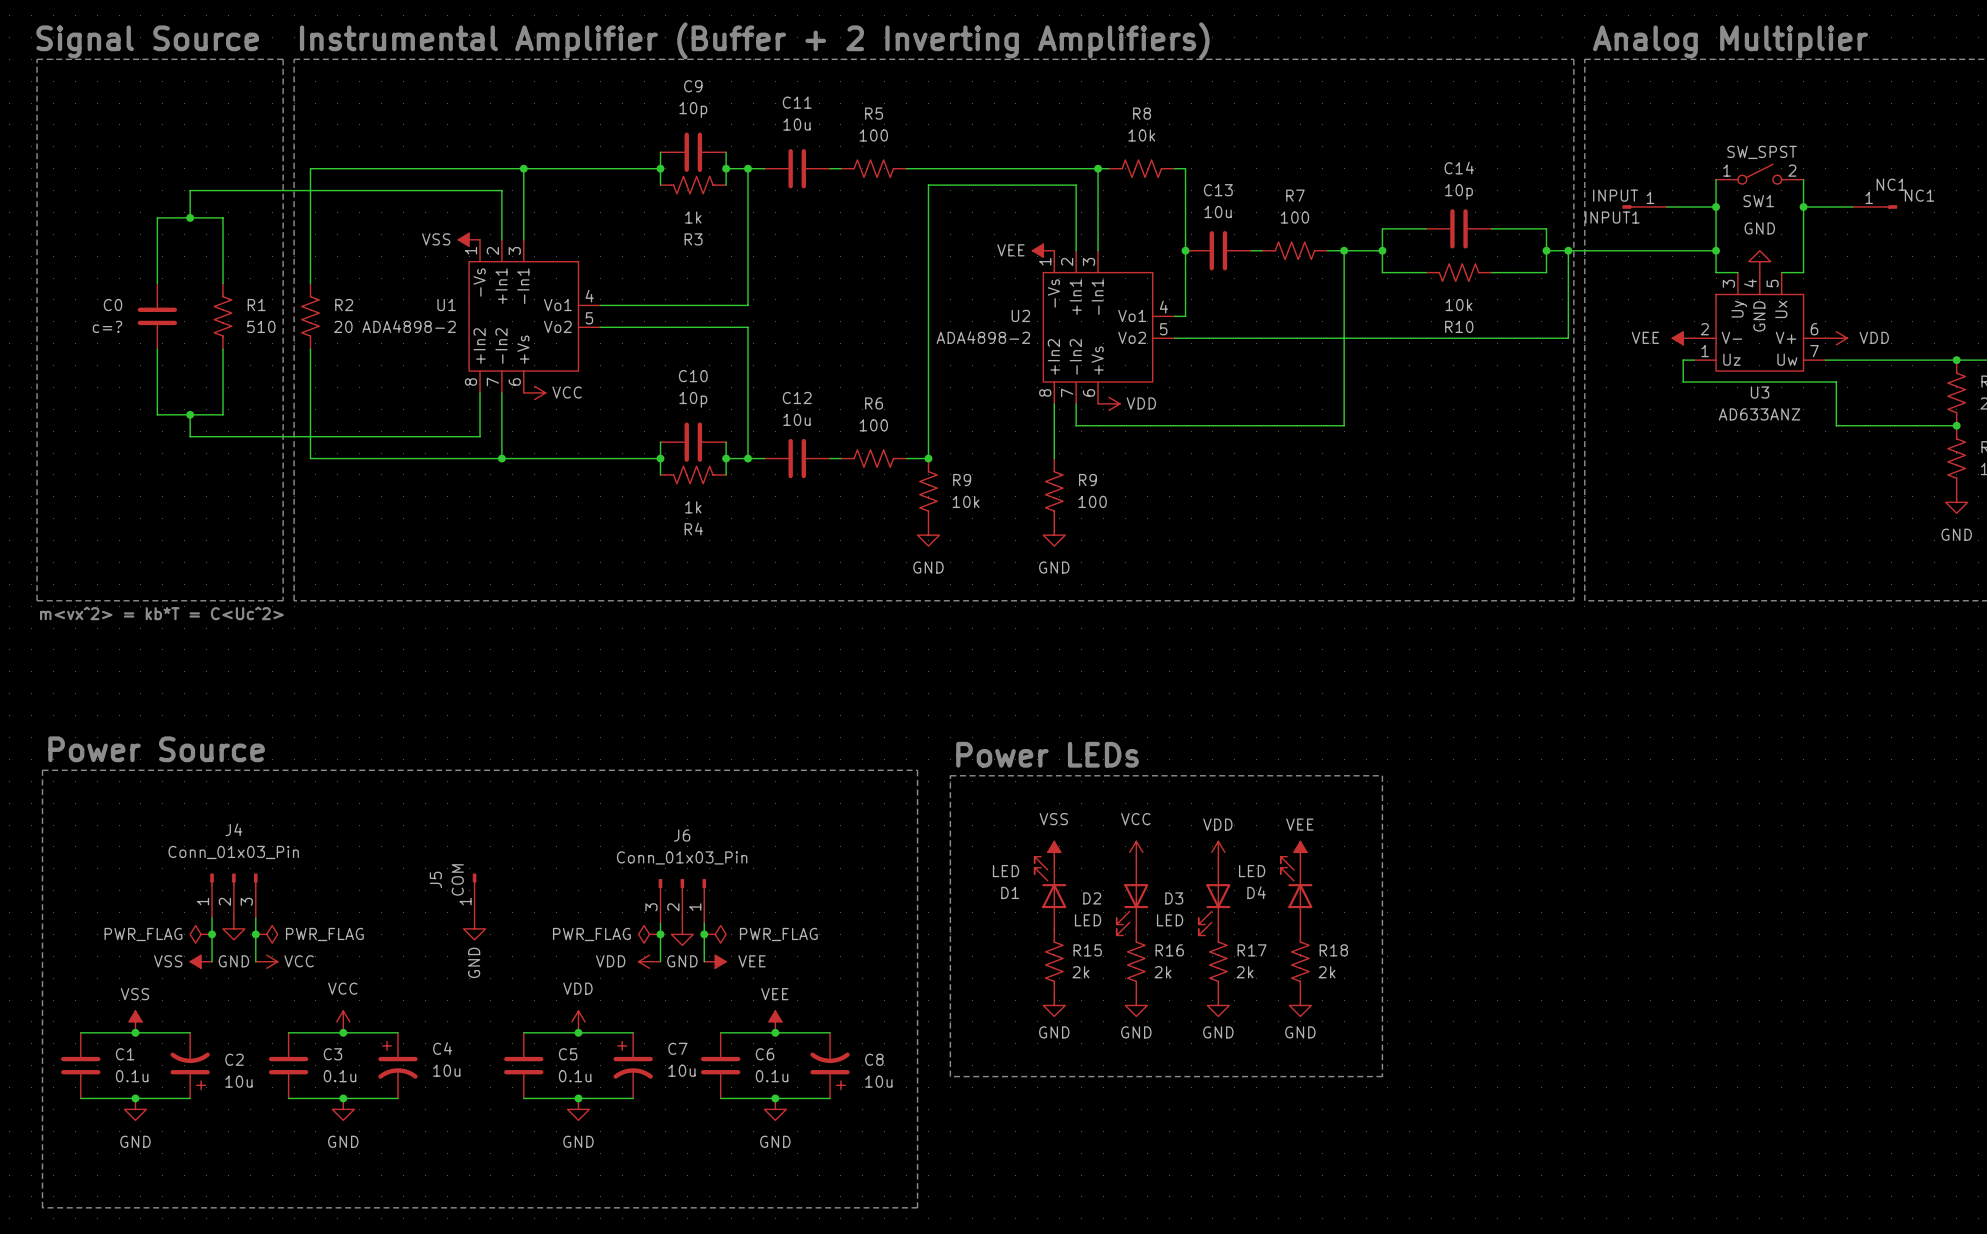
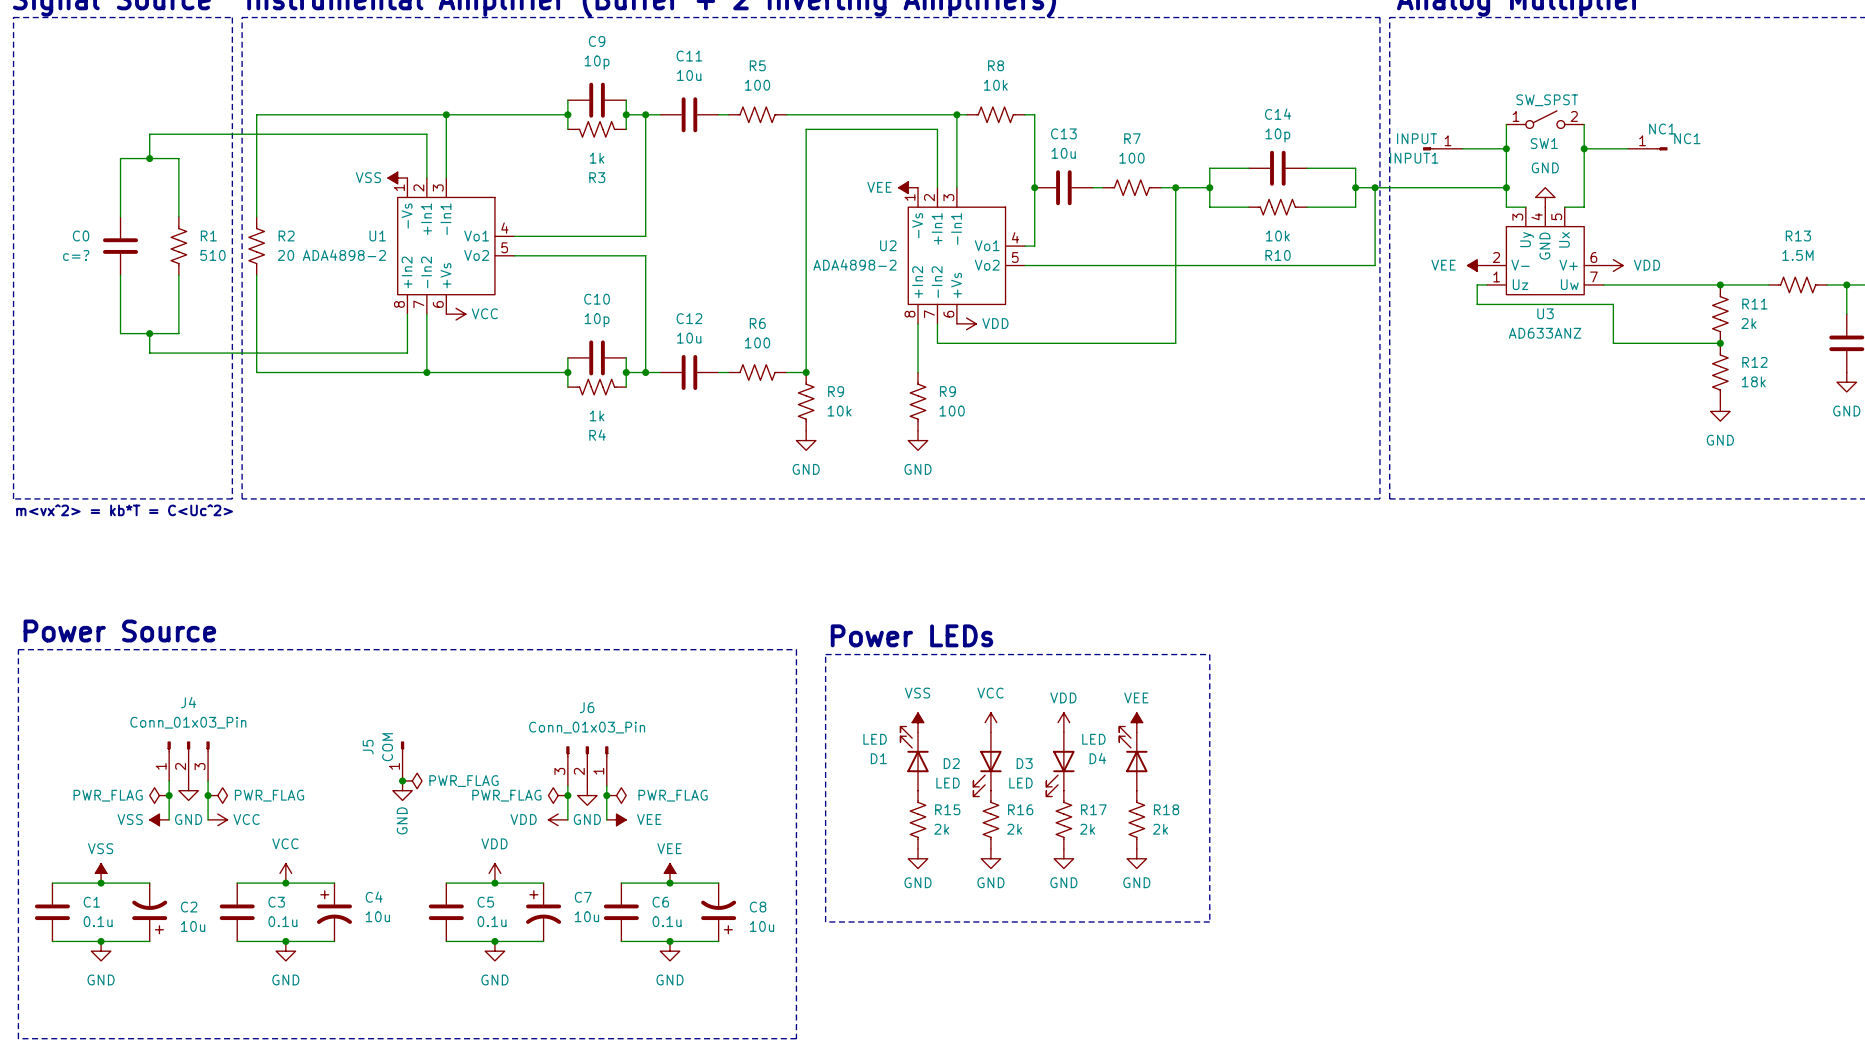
junction: none -> (402, 780)
power symbol: none -> PWR_FLAG (412, 780)

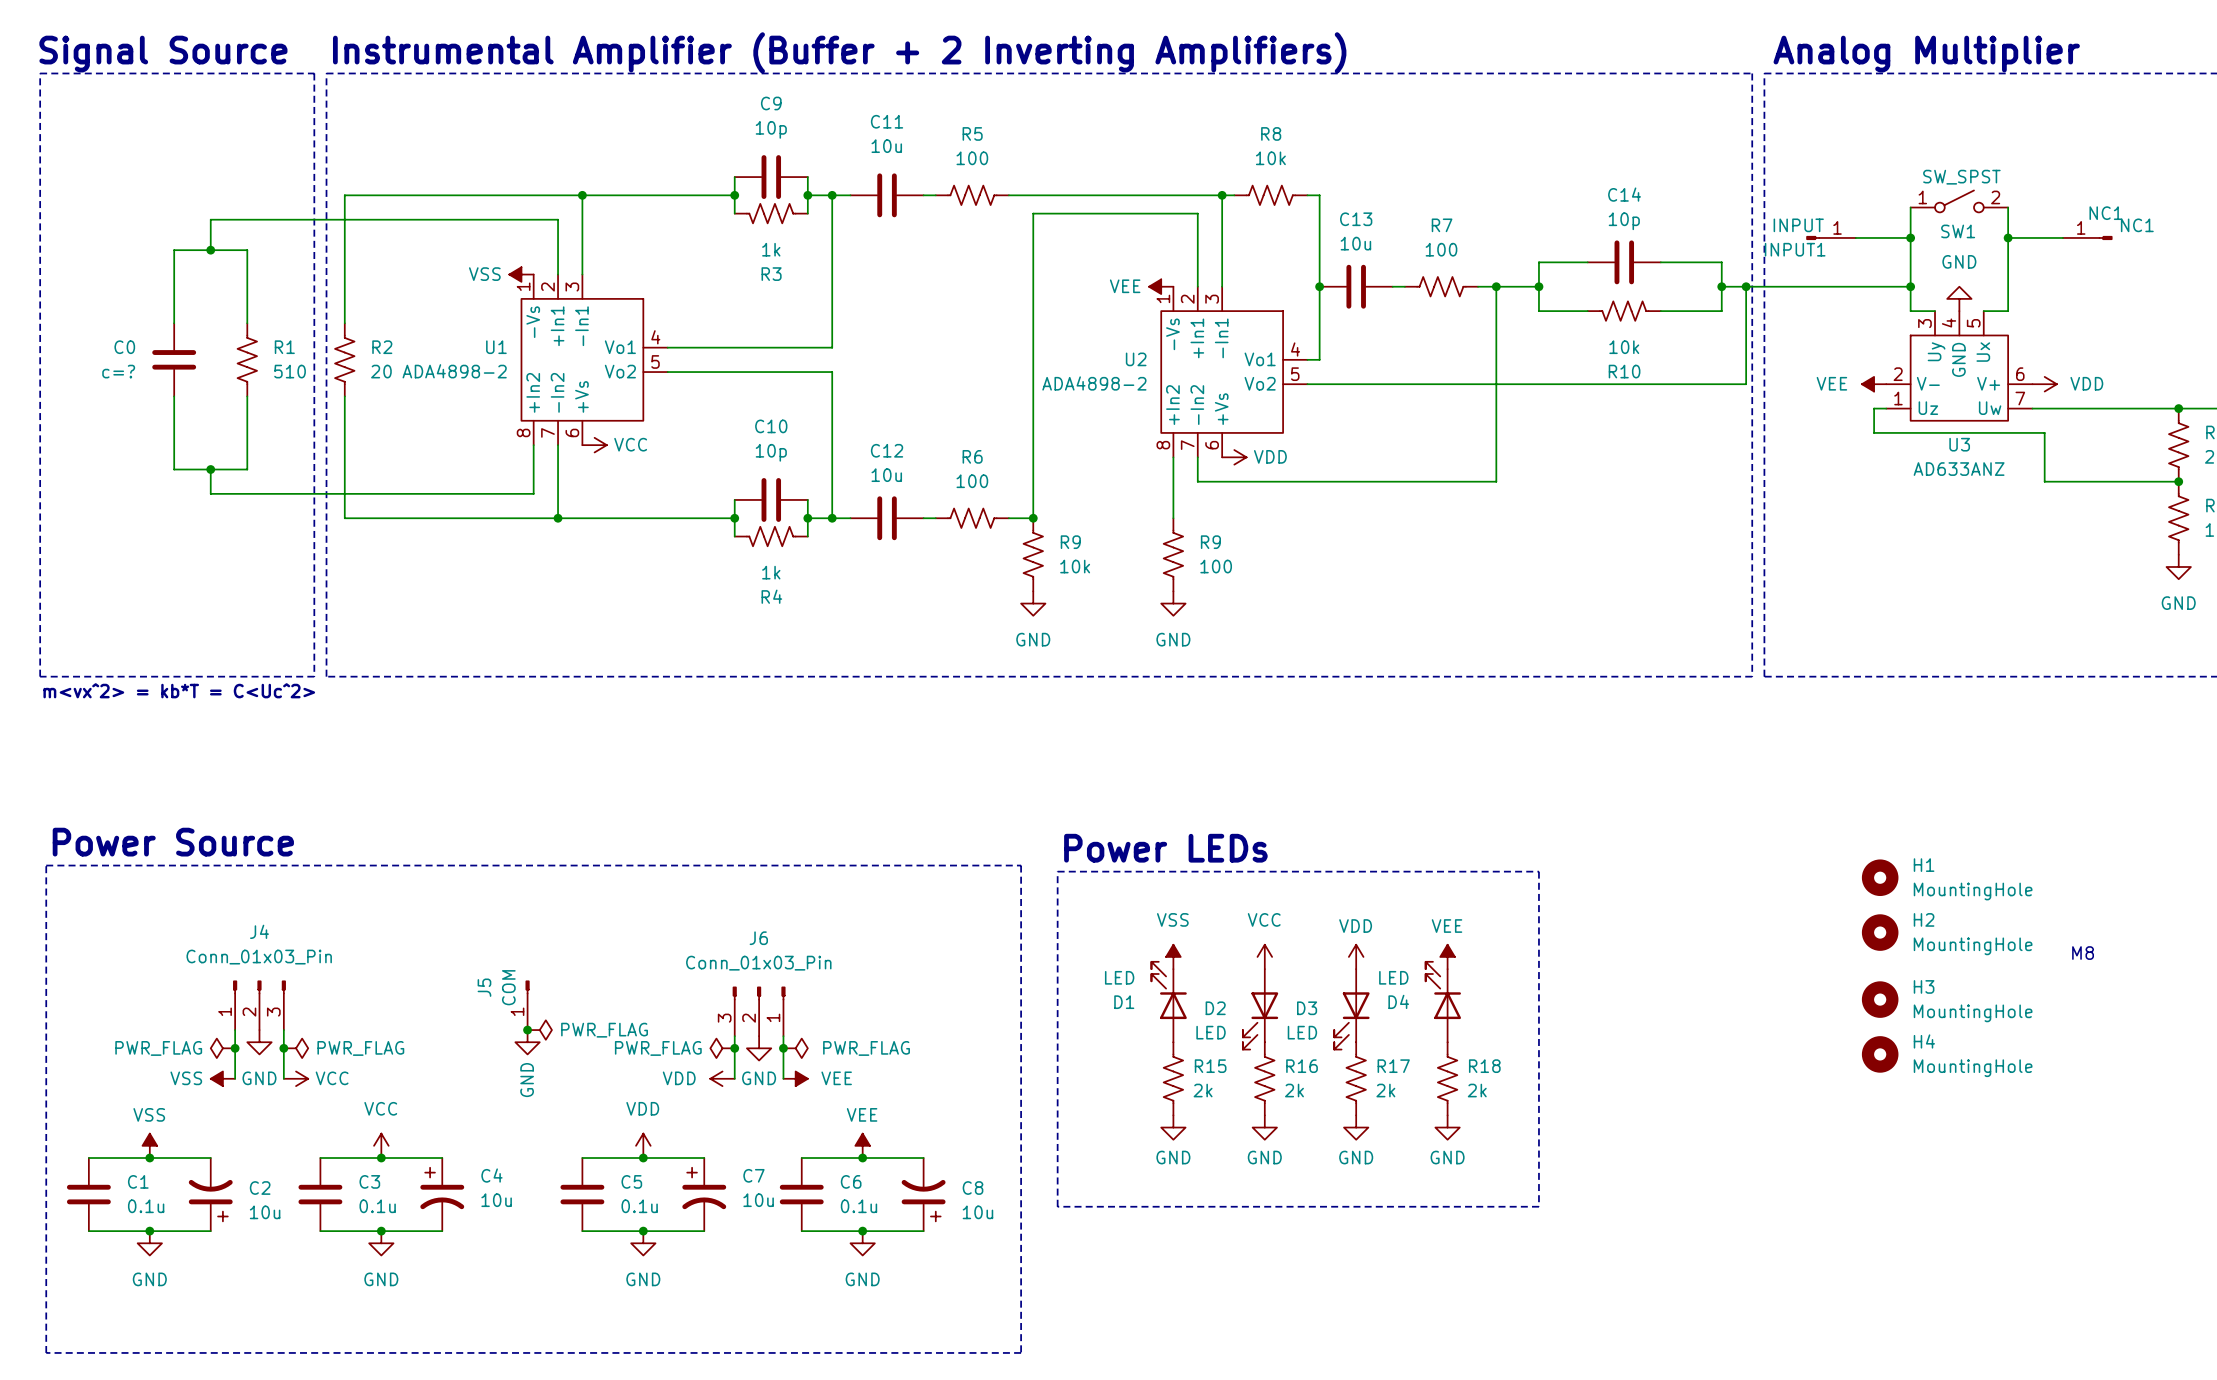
H1: none -> MountingHole (1880, 877)
H2: none -> MountingHole (1880, 932)
text: none -> M8 (2083, 953)
H3: none -> MountingHole (1880, 999)
H4: none -> MountingHole (1880, 1054)

